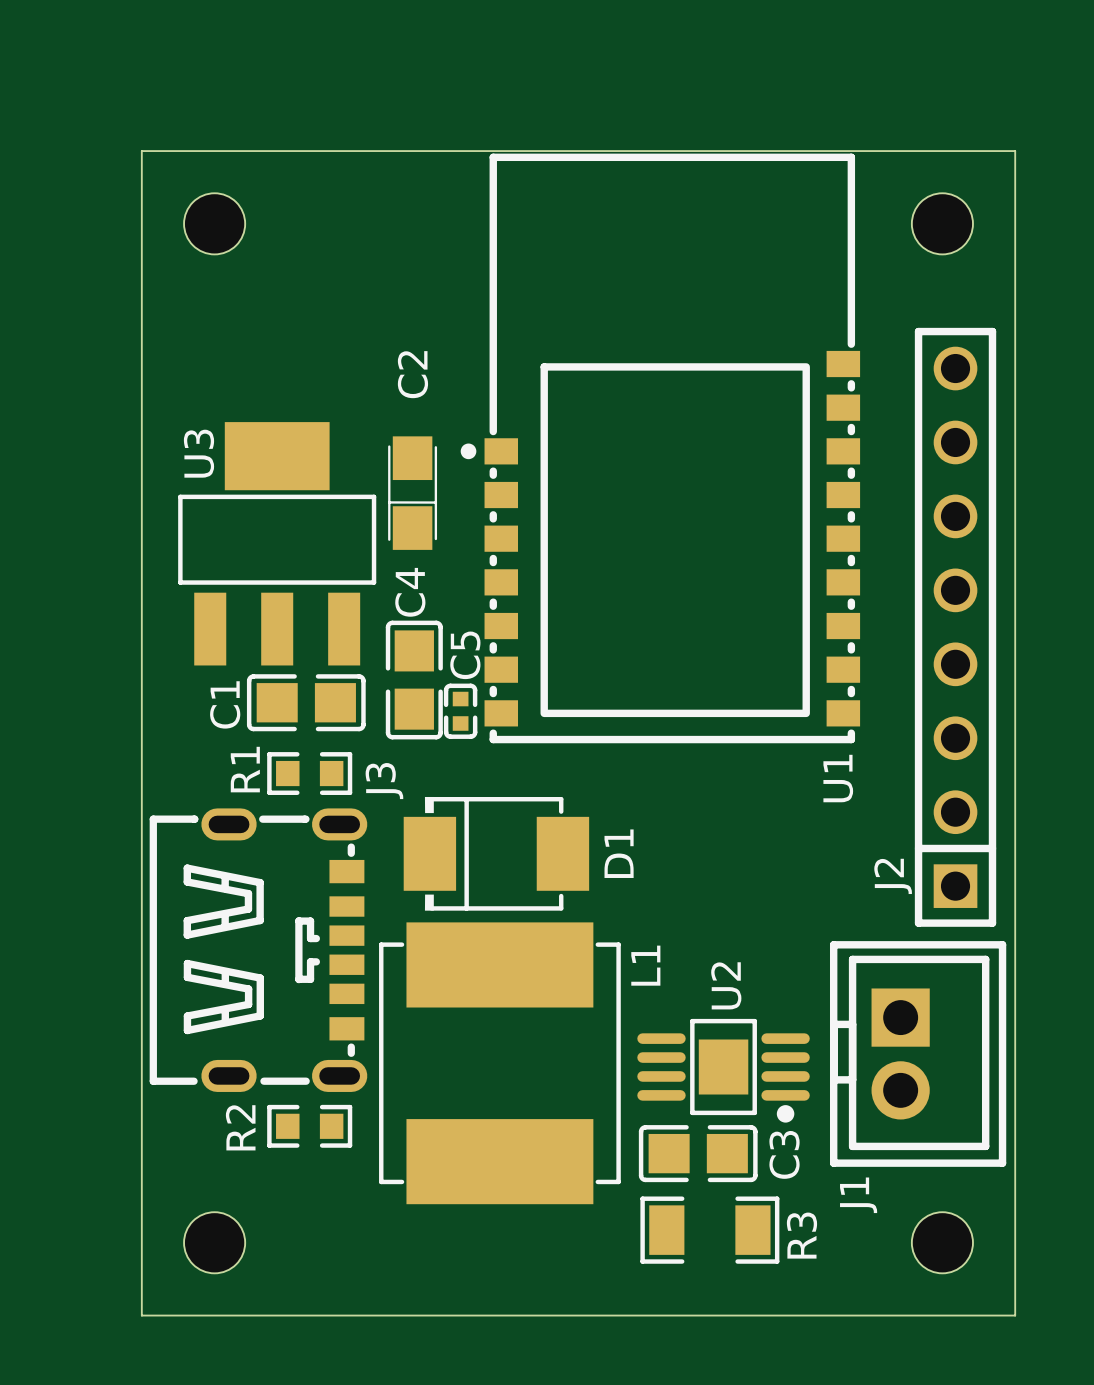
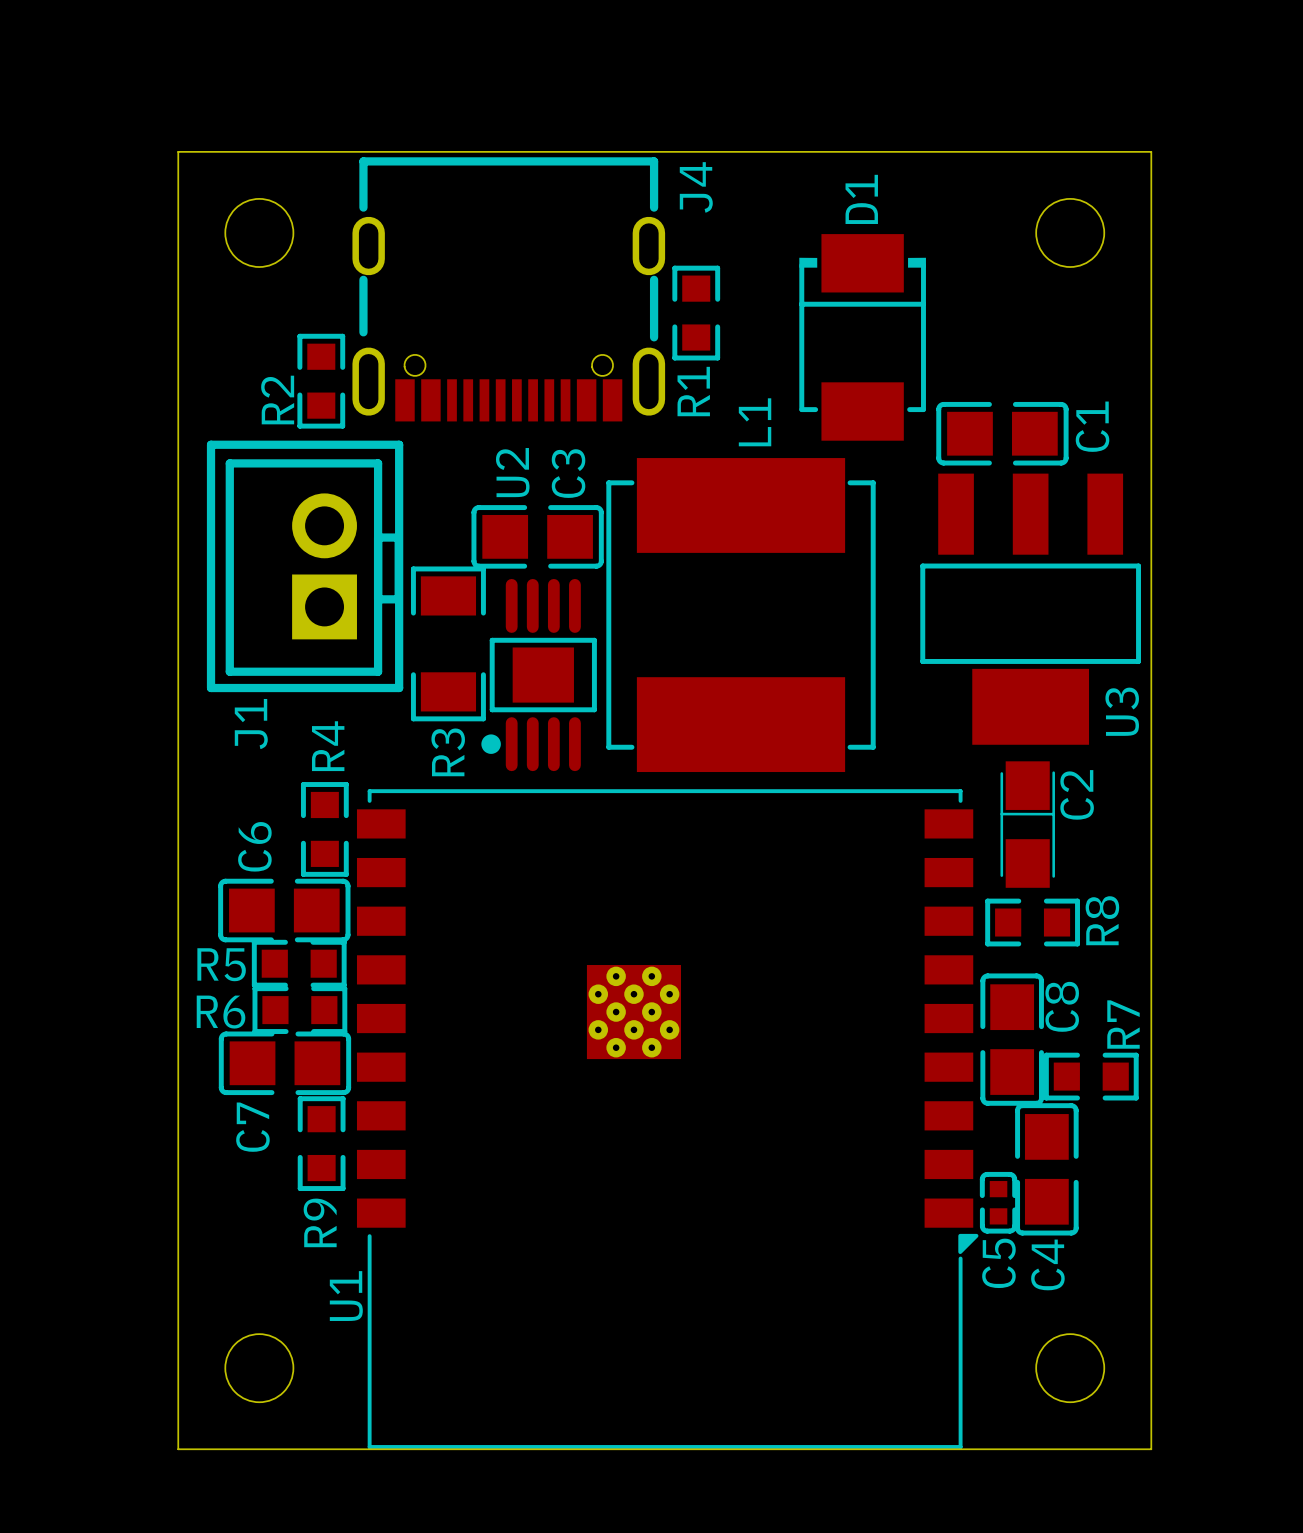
U1 footprint: [460, 153, 861, 744] -> [356, 789, 979, 1449]
J4: none -> (508, 289)
C2 name position: C2 (412, 374) -> C2 (1077, 794)
C2 rotation: 0° (412, 493) -> 180° (1027, 824)
C2 position: (412, 493) -> (1027, 824)
U3 rotation: 0° (277, 543) -> 180° (1030, 609)
U3 position: (277, 543) -> (1030, 609)
C4 name position: C4 (410, 592) -> C4 (1047, 1264)
part: (955, 627) -> none
C5 name position: C5 (465, 655) -> C5 (998, 1263)
C4 position: (414, 680) -> (1046, 1169)
C1 position: (306, 702) -> (1002, 433)
C1 name position: C1 (225, 704) -> C1 (1092, 426)
C5 position: (460, 711) -> (998, 1202)
R4: none -> (324, 829)
R1 name position: R1 (245, 769) -> R1 (693, 391)
R1 rotation: 0° (309, 773) -> 90° clockwise (696, 313)
R1 position: (309, 773) -> (696, 313)
U1 name position: U1 (838, 778) -> U1 (346, 1296)
C6: none -> (284, 910)
R8: none -> (1032, 922)
D1 rotation: 0° (496, 853) -> 90° clockwise (862, 337)
D1 position: (496, 853) -> (862, 337)
D1 name position: D1 (619, 853) -> D1 (861, 199)
text: J2 (893, 876) -> none
R5: none -> (299, 963)
R6: none -> (299, 1010)
C8: none -> (1012, 1039)
J3: (258, 950) -> none
L1 name position: L1 (645, 965) -> L1 (755, 422)
C7: none -> (284, 1063)
R7: none -> (1091, 1076)
U2 name position: U2 (726, 985) -> U2 (512, 472)
R9: none -> (321, 1143)
J1 rotation: 0° (918, 1053) -> 180° (305, 566)
J1 position: (918, 1053) -> (305, 566)
L1 position: (499, 1063) -> (741, 615)
U2 rotation: 0° (723, 1070) -> 90° clockwise (539, 675)
U2 position: (723, 1070) -> (539, 675)
R2 rotation: 0° (309, 1126) -> 90° clockwise (321, 381)
R2 position: (309, 1126) -> (321, 381)
C3 position: (698, 1153) -> (537, 536)
C3 name position: C3 (784, 1154) -> C3 (568, 473)
R3 rotation: 0° (709, 1230) -> 90° clockwise (448, 643)
R3 position: (709, 1230) -> (448, 643)

